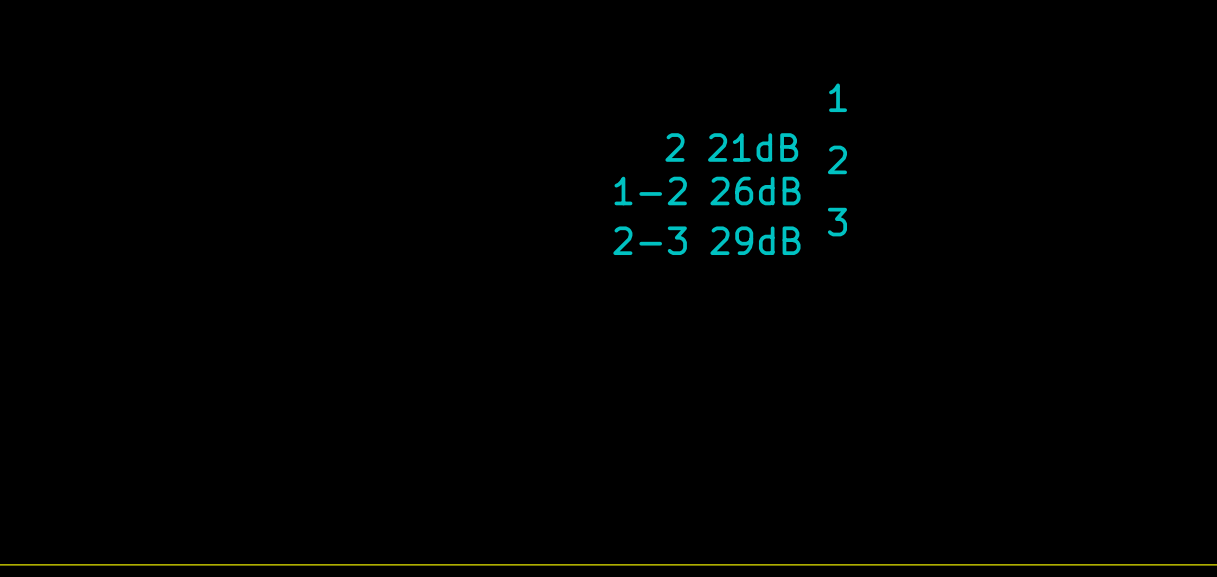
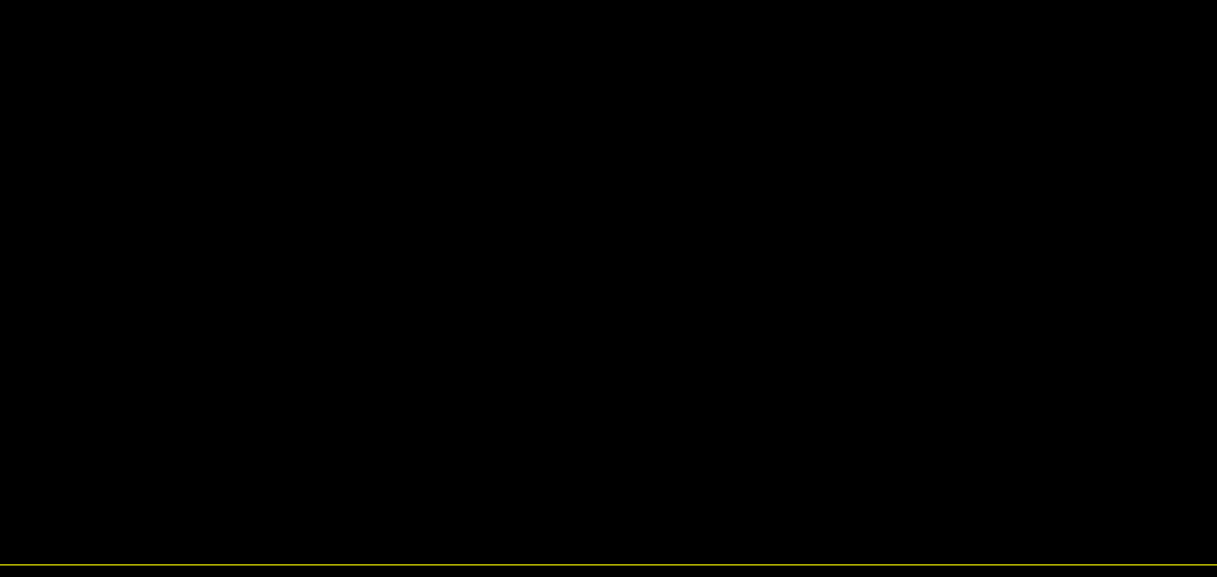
text: 1 (838, 97) -> none
text: 2 21dB (731, 147) -> none
text: 2 (837, 159) -> none
text: 1-2 26dB (707, 191) -> none
text: 3 (837, 222) -> none
text: 2-3 29dB (706, 240) -> none

